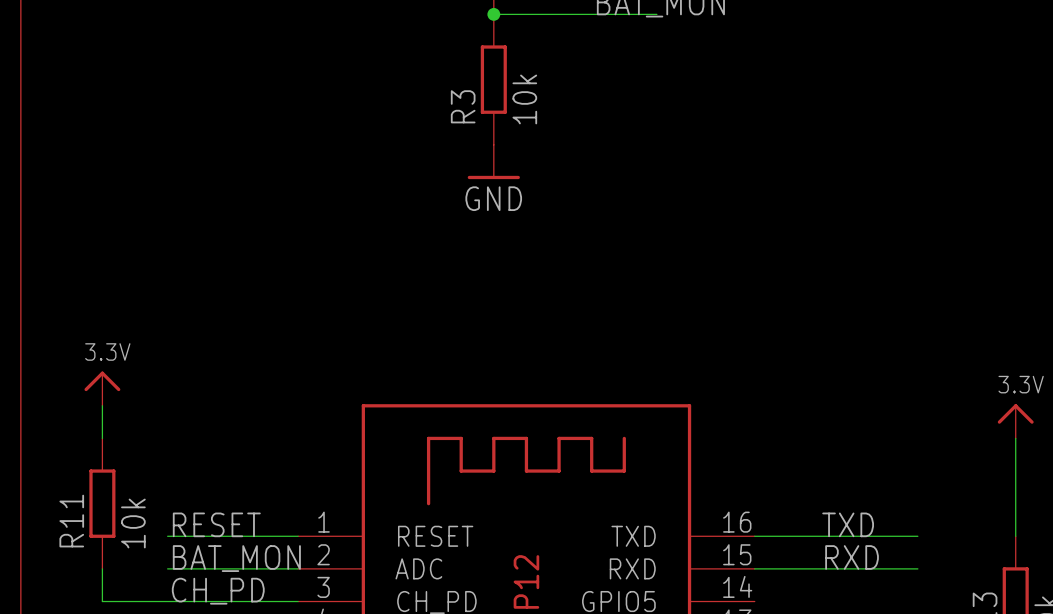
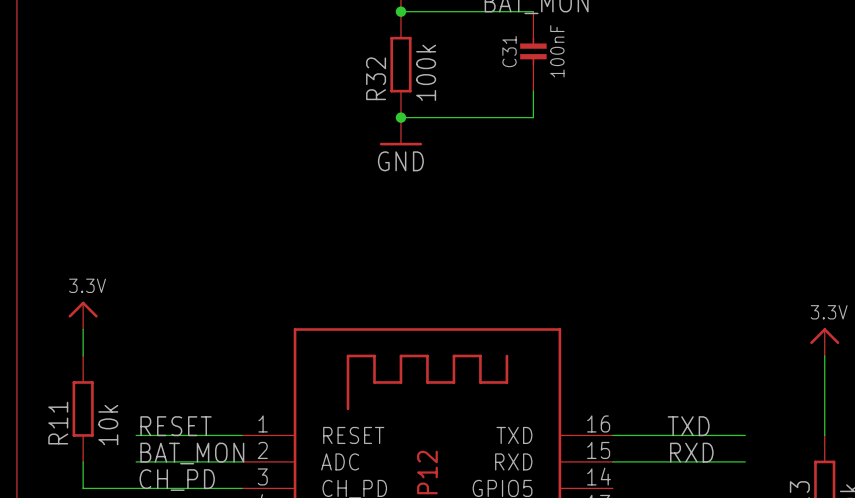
C31: none -> 100nF (533, 51)
R3 value: 10k (524, 99) -> 100k (426, 72)
R3 name: R3 (463, 106) -> R32 (376, 78)
wire: none -> (533, 91) (533, 117) (400, 117)
junction: none -> (400, 117)

